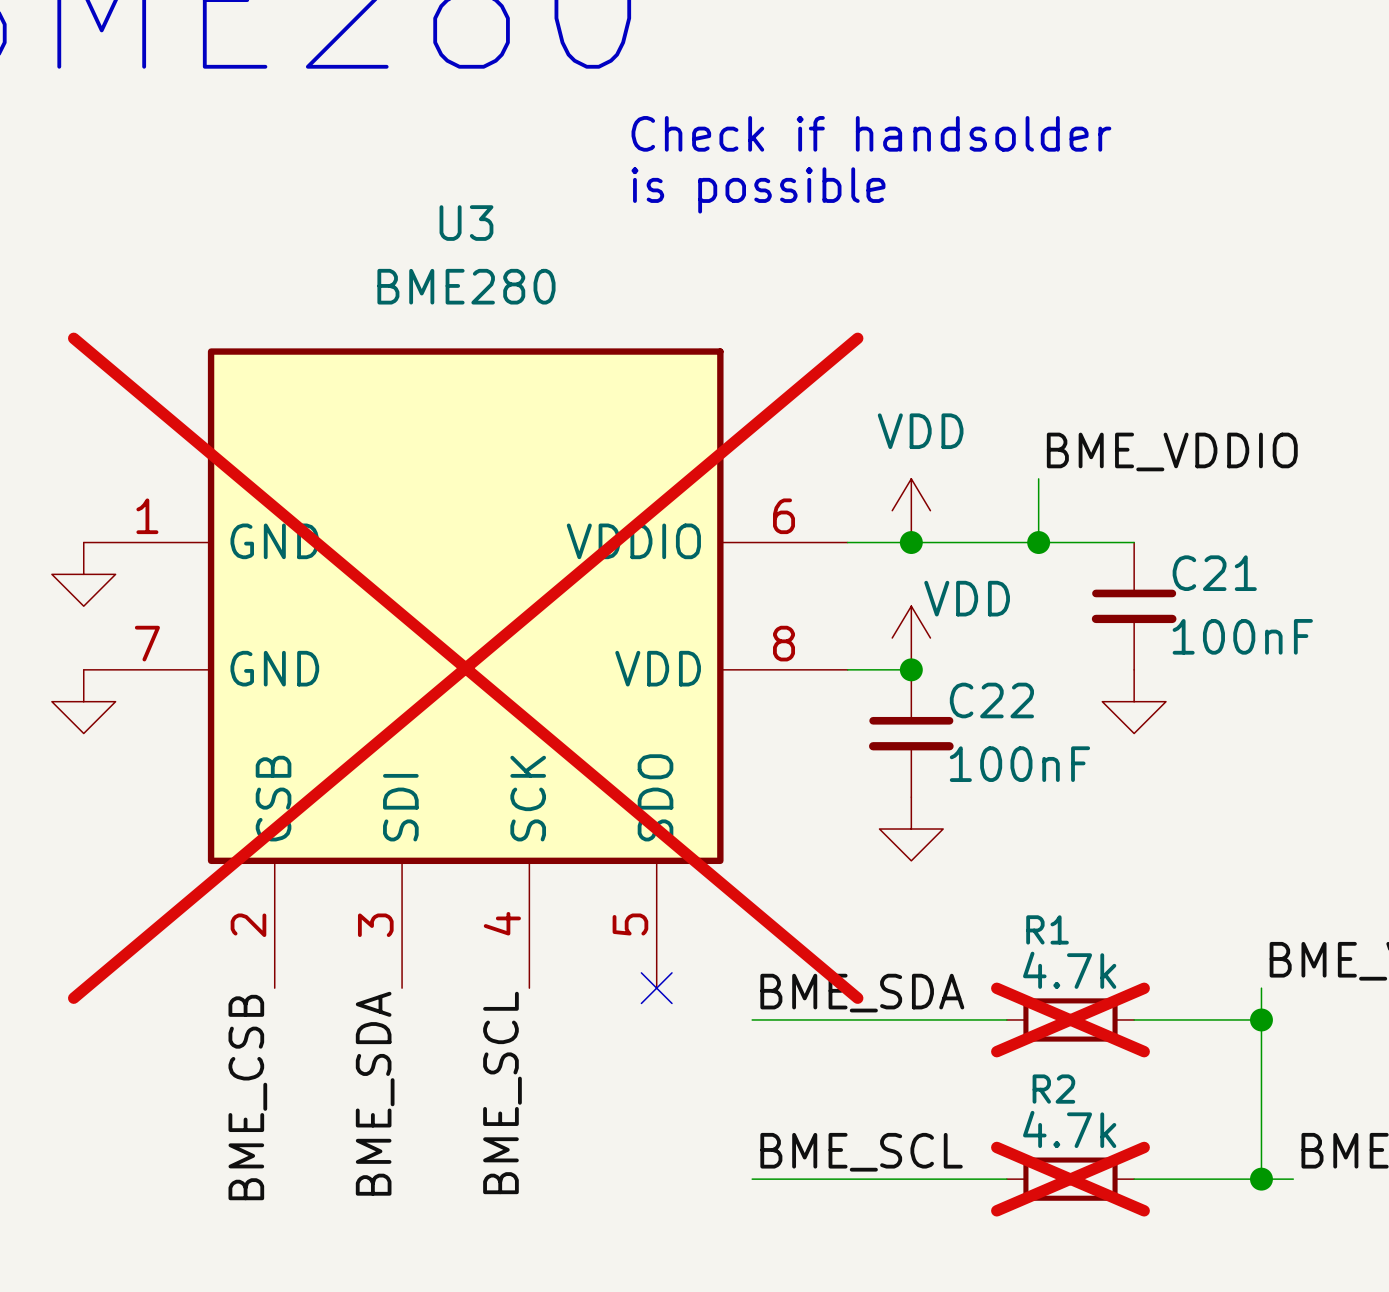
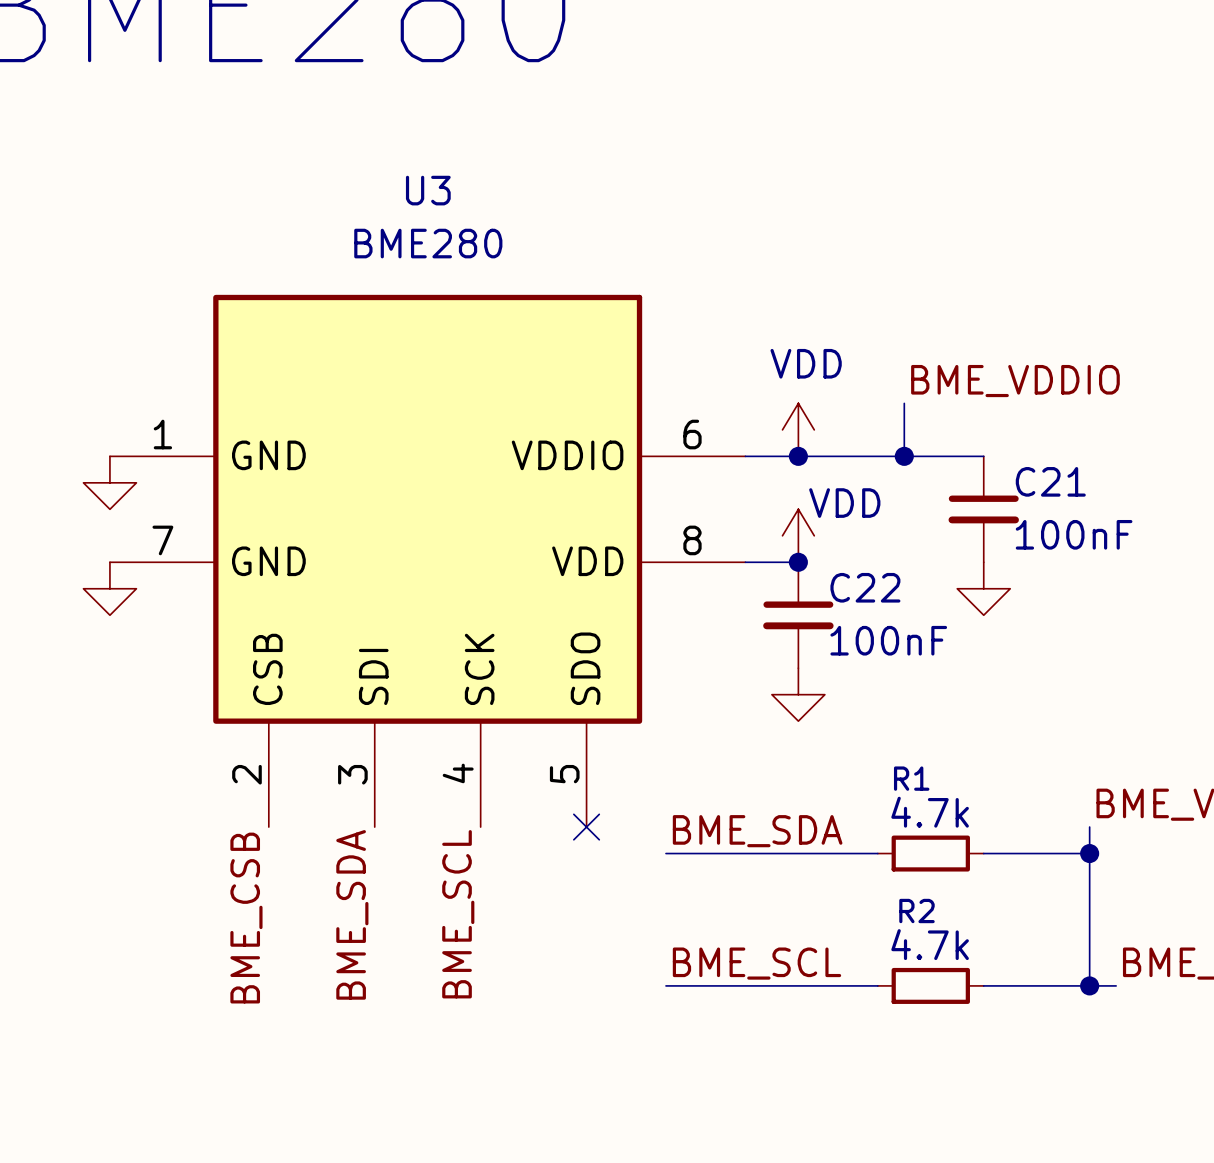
text: Check if handsolder (871, 133) -> none
text: is possible (758, 190) -> none
U3 do-not-place cross: (465, 668) -> none
R1 do-not-place cross: (1070, 1019) -> none
R2 do-not-place cross: (1070, 1179) -> none

